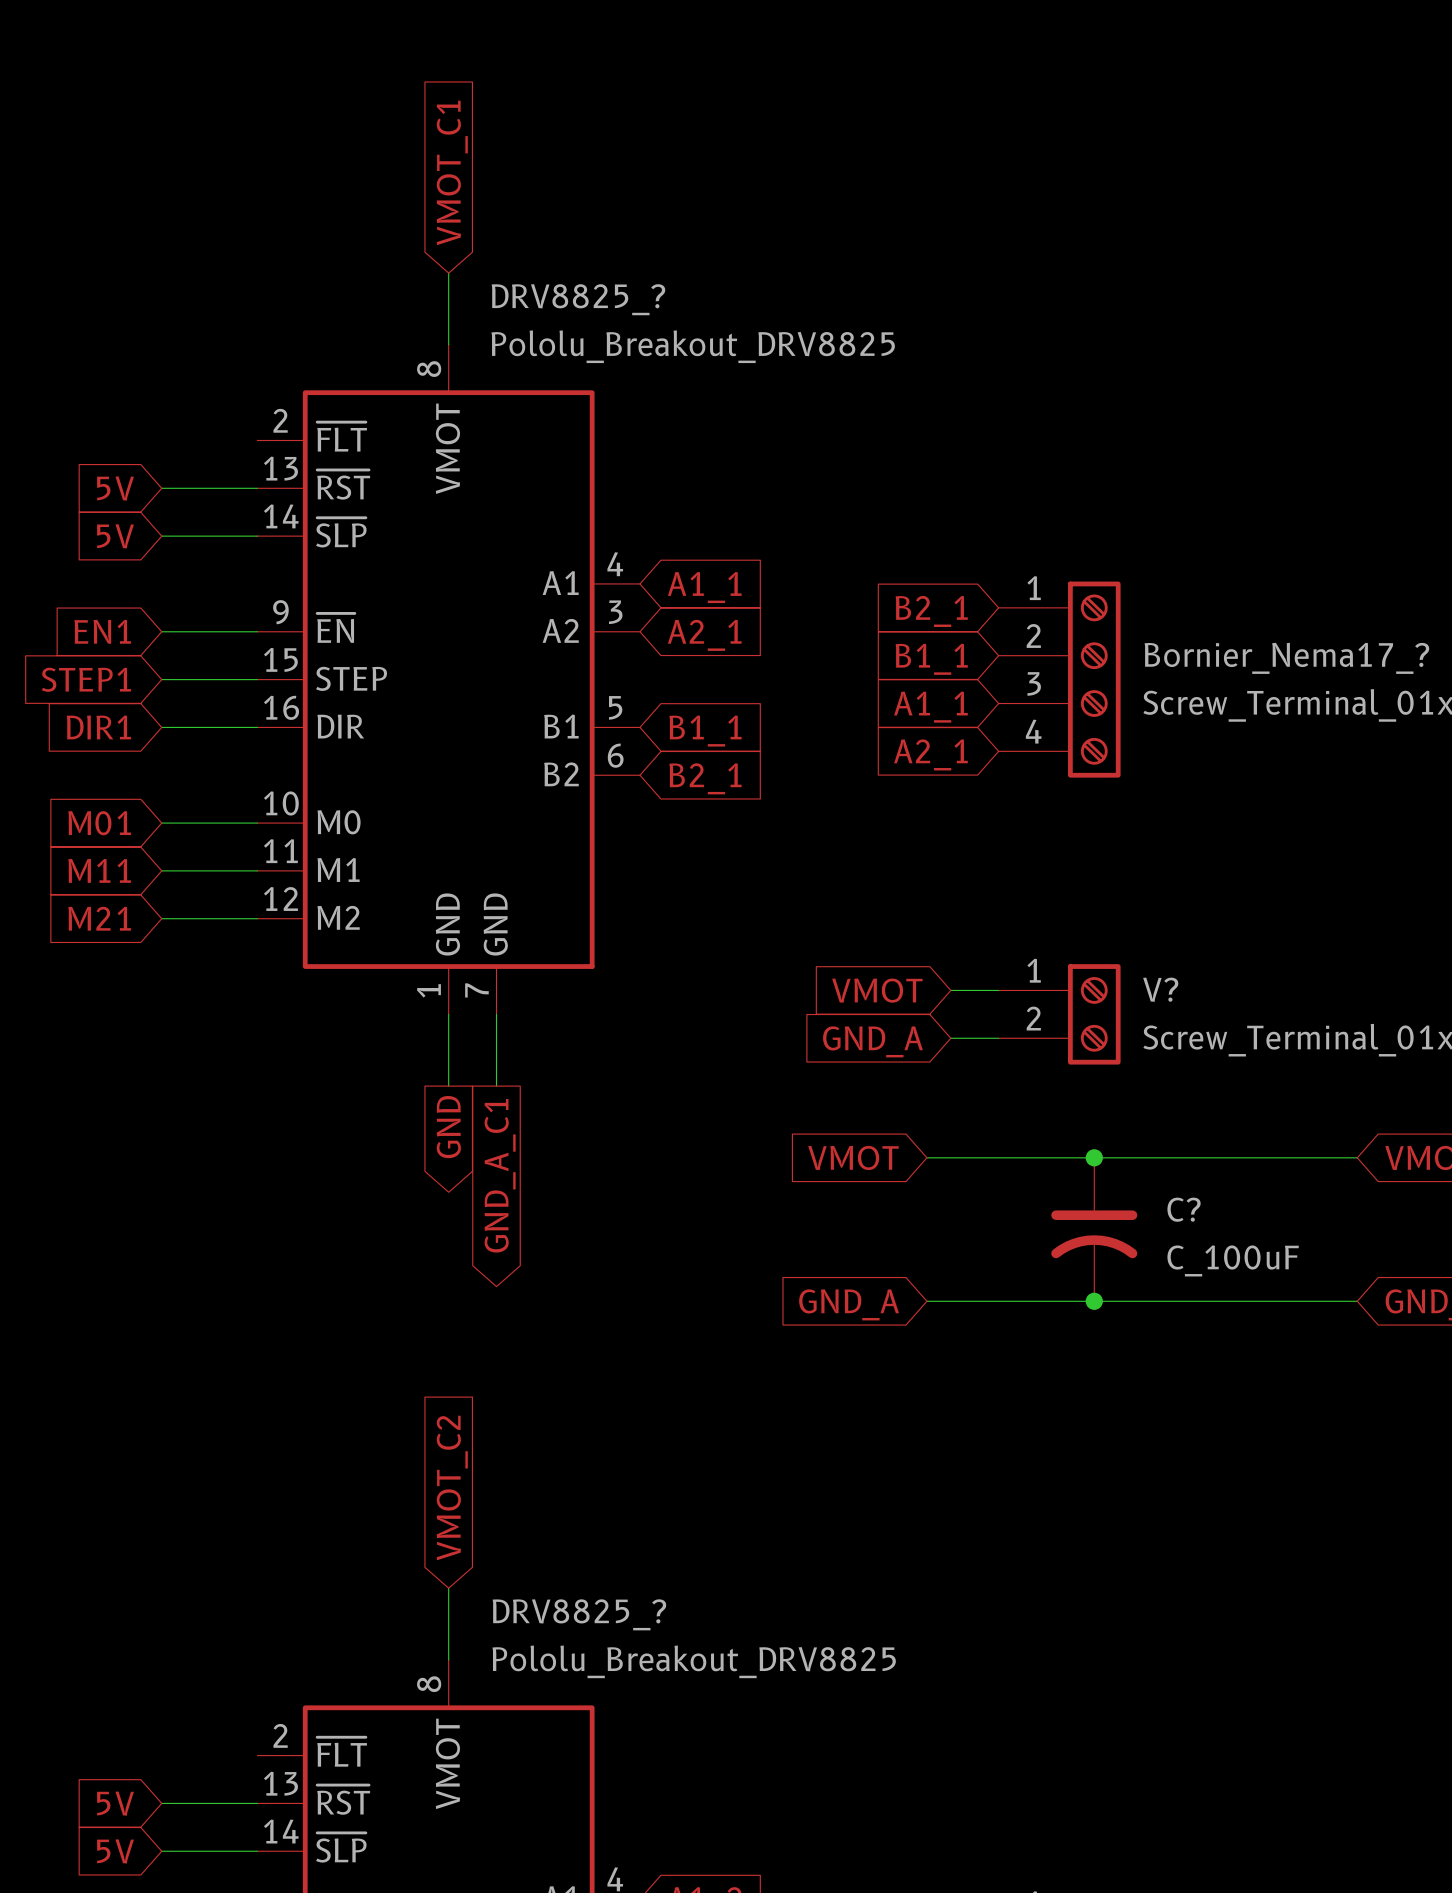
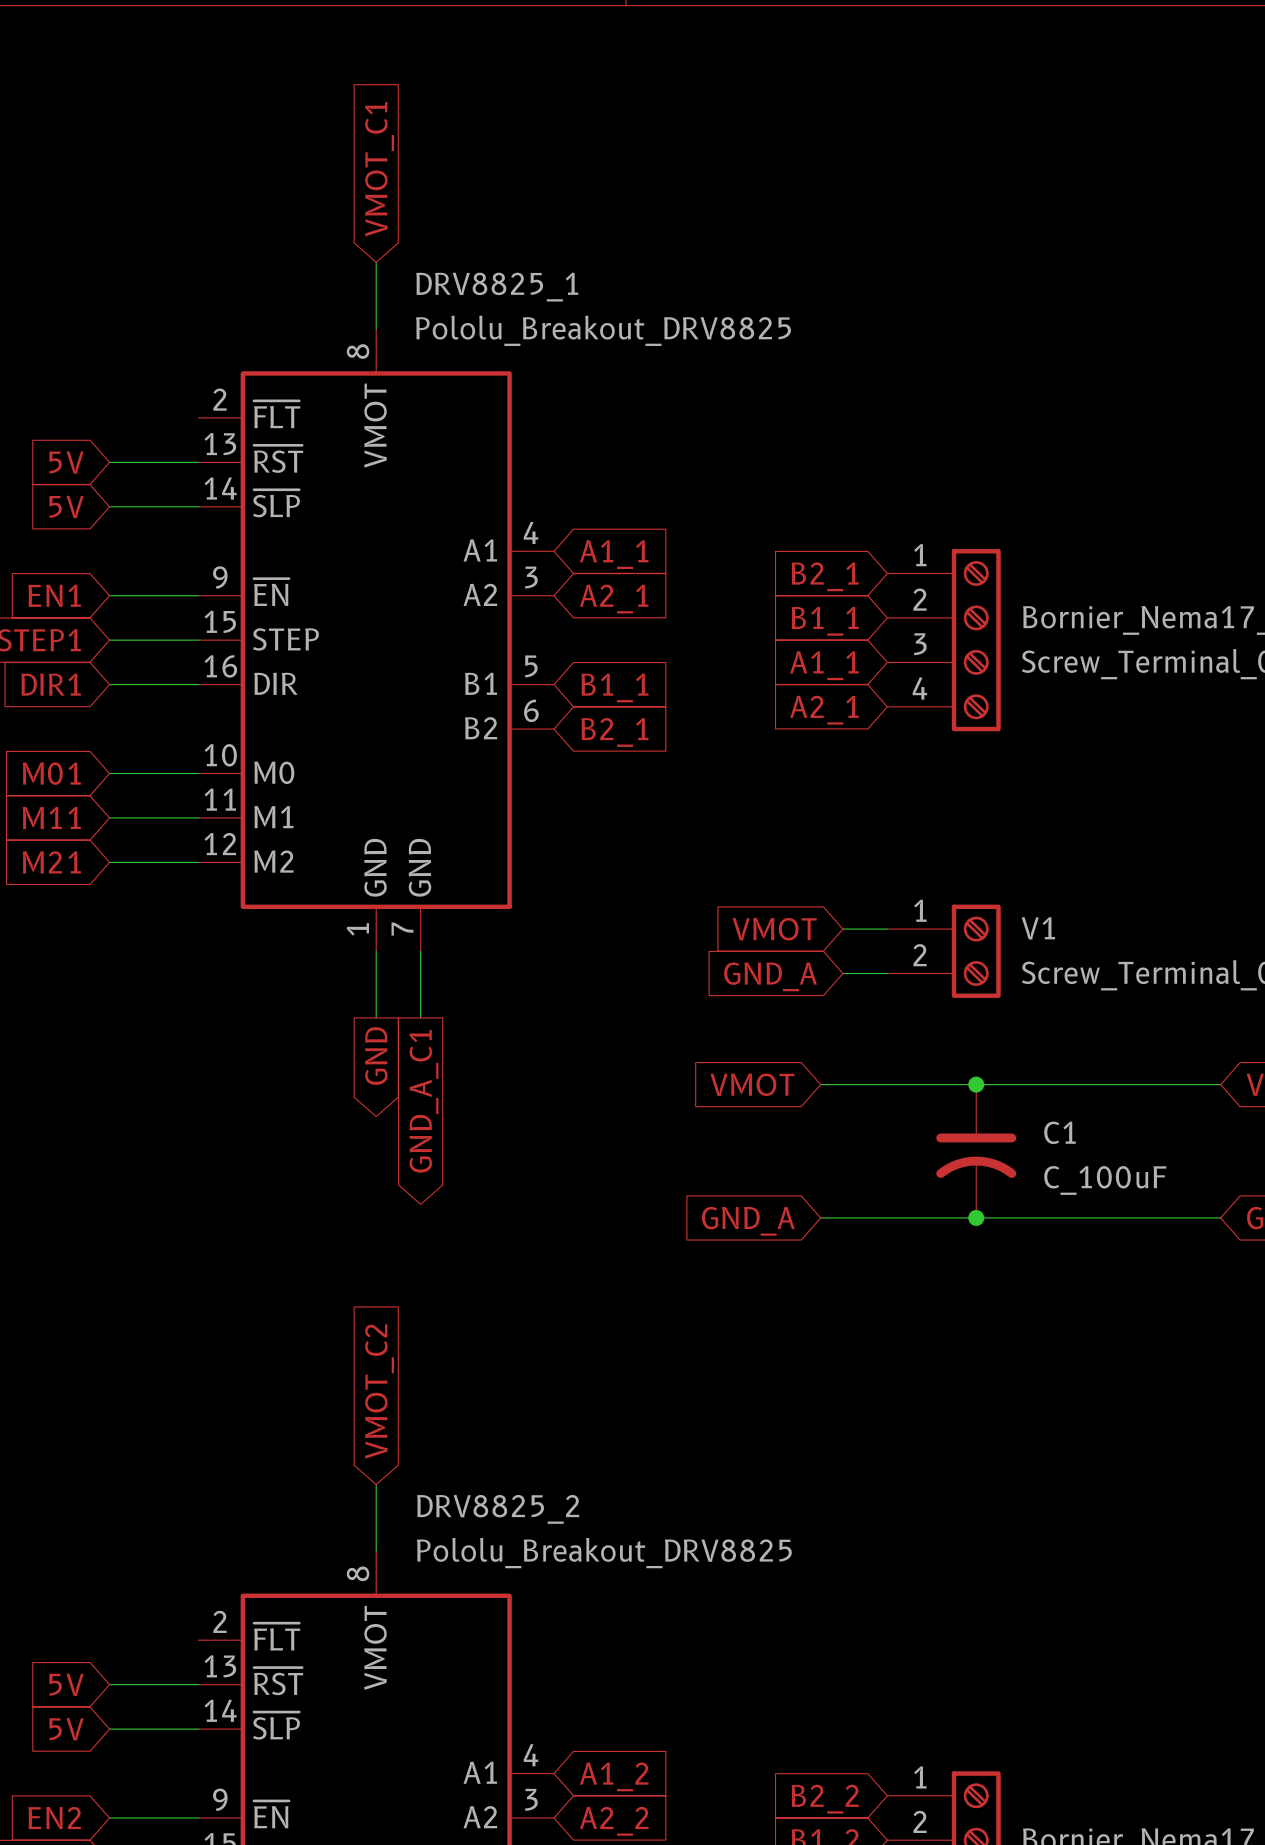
DRV8825_? name: DRV8825_? (578, 299) -> DRV8825_1 (497, 287)
V? name: V? (1160, 989) -> V1 (1038, 928)
C? name: C? (1184, 1209) -> C1 (1060, 1132)
DRV8825_? name: DRV8825_? (579, 1614) -> DRV8825_2 (498, 1509)

